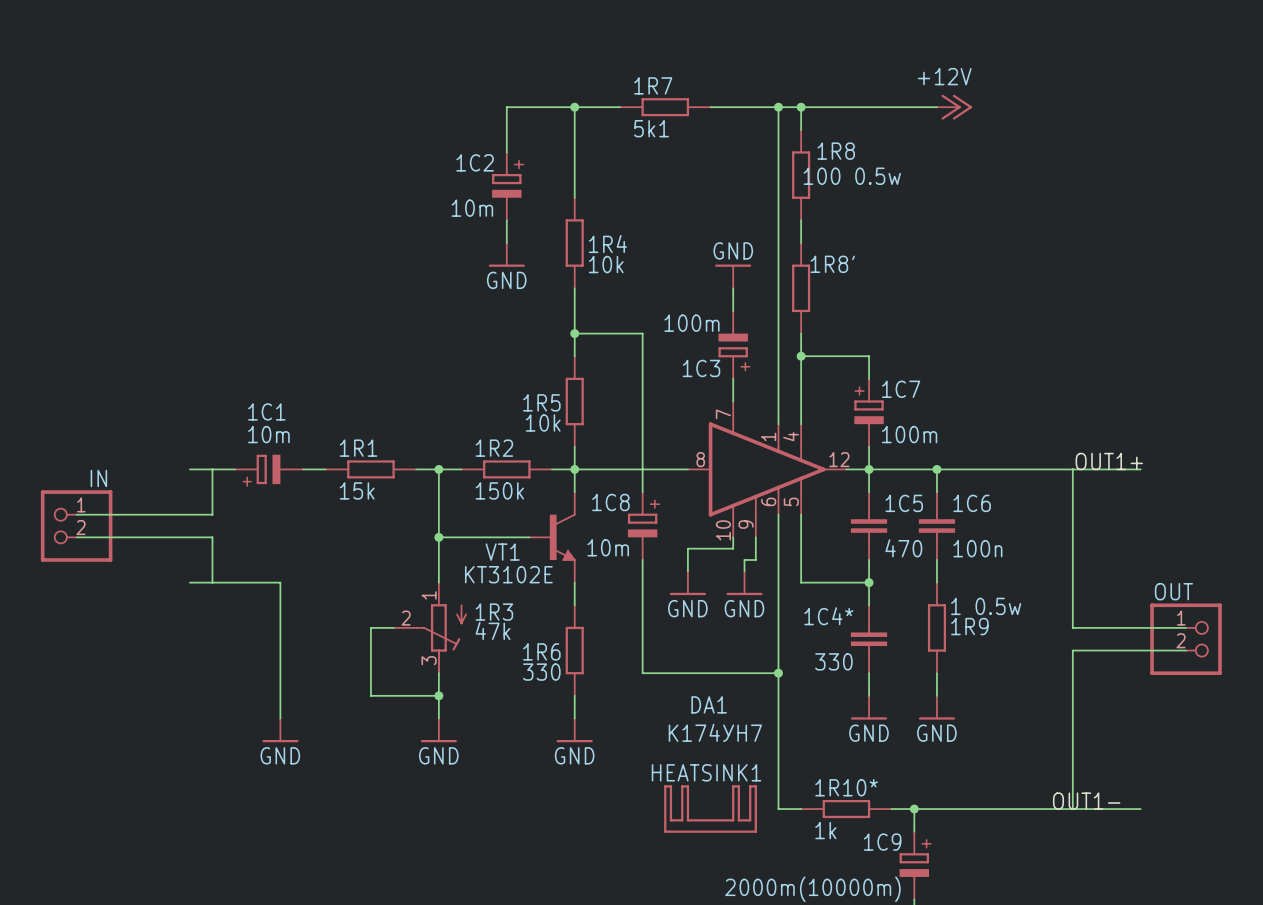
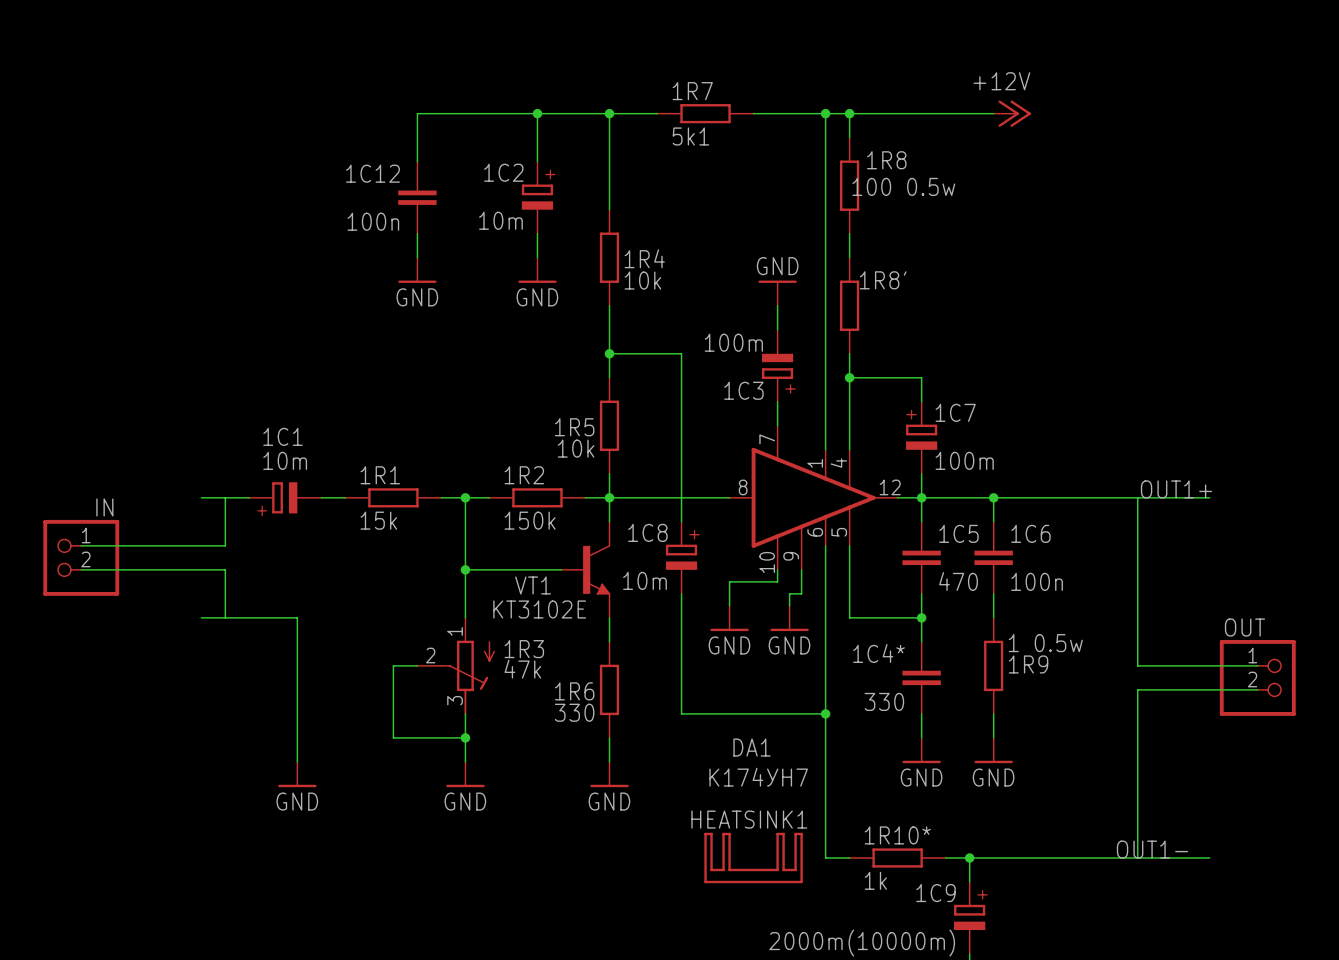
wire: none -> (537, 113) (417, 113) (417, 161)
junction: none -> (537, 113)
1C12: none -> 100n (417, 197)
wire: none -> (417, 233) (417, 257)
power symbol: none -> GND (417, 270)

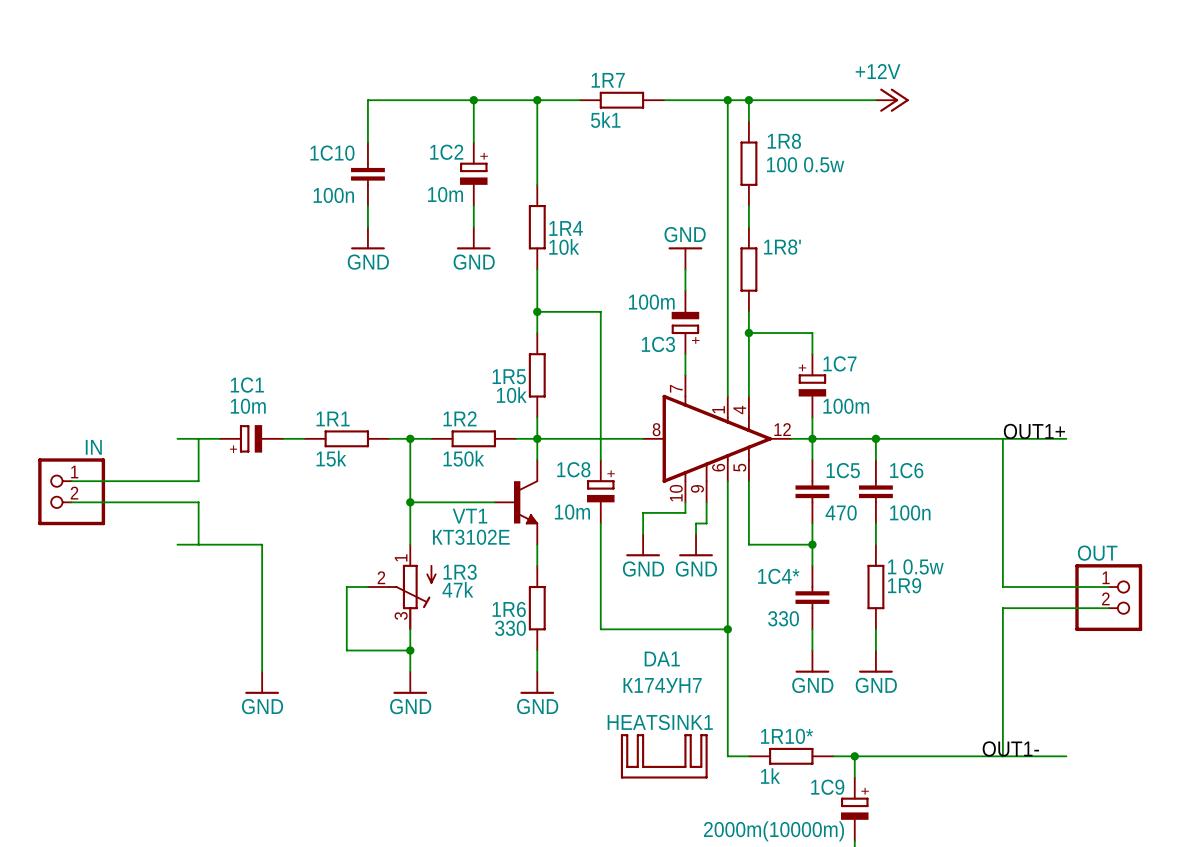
1C12 name: 1C12 (372, 173) -> 1C10 (332, 153)

